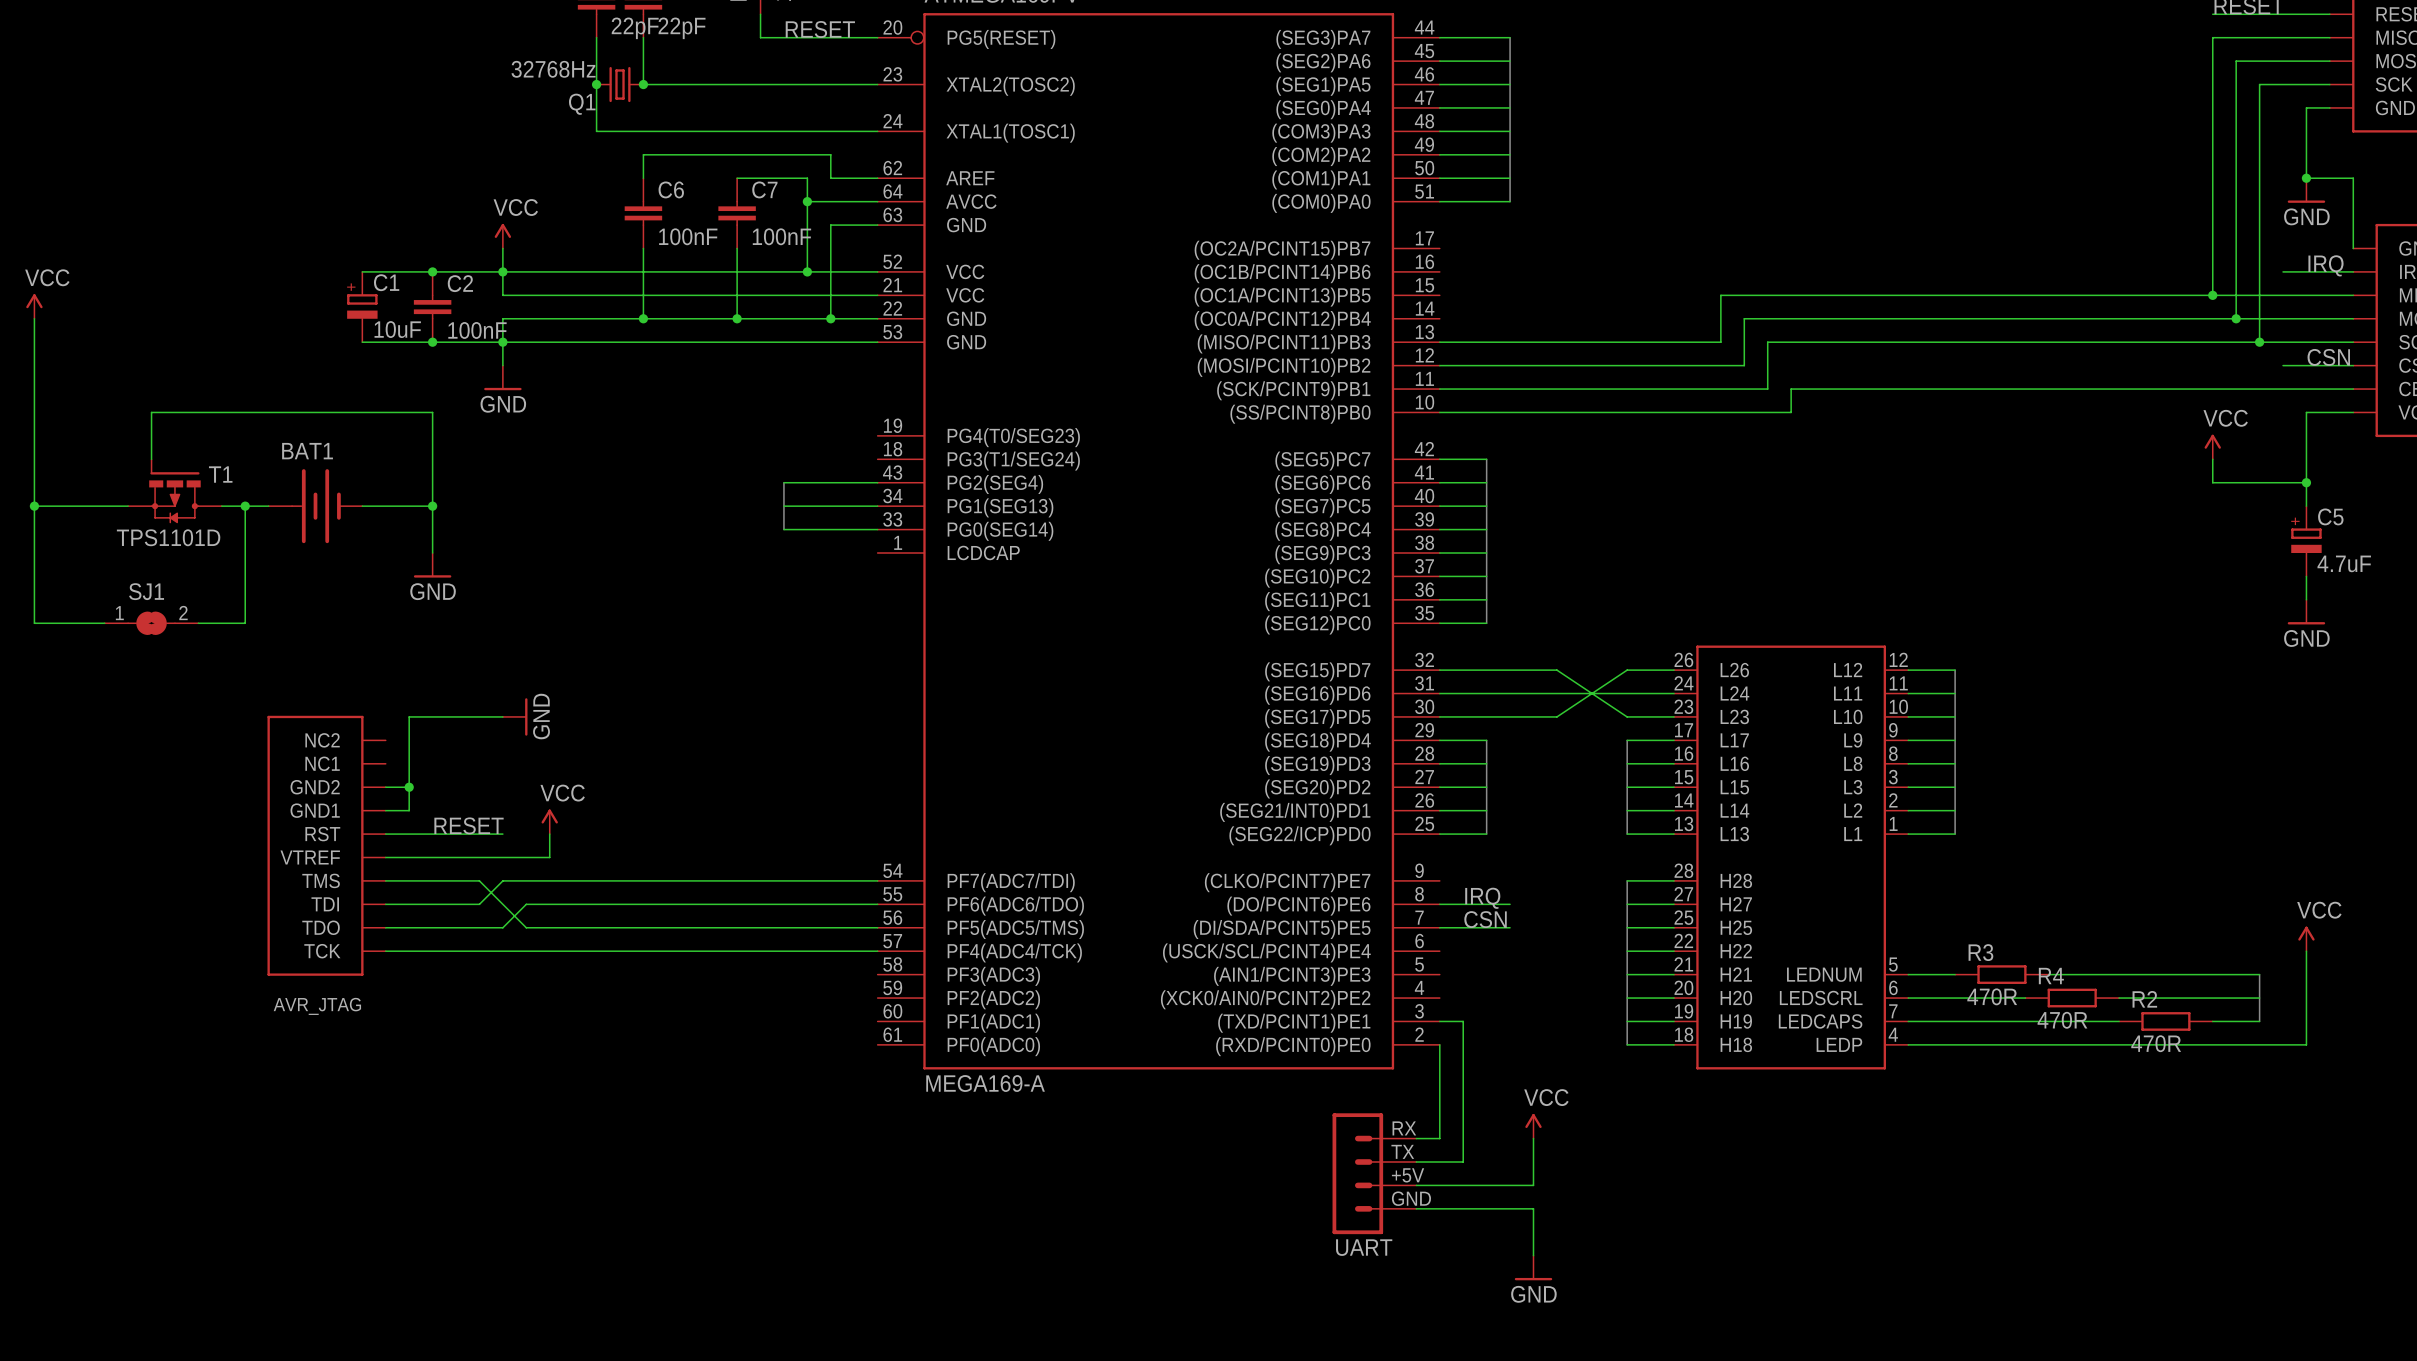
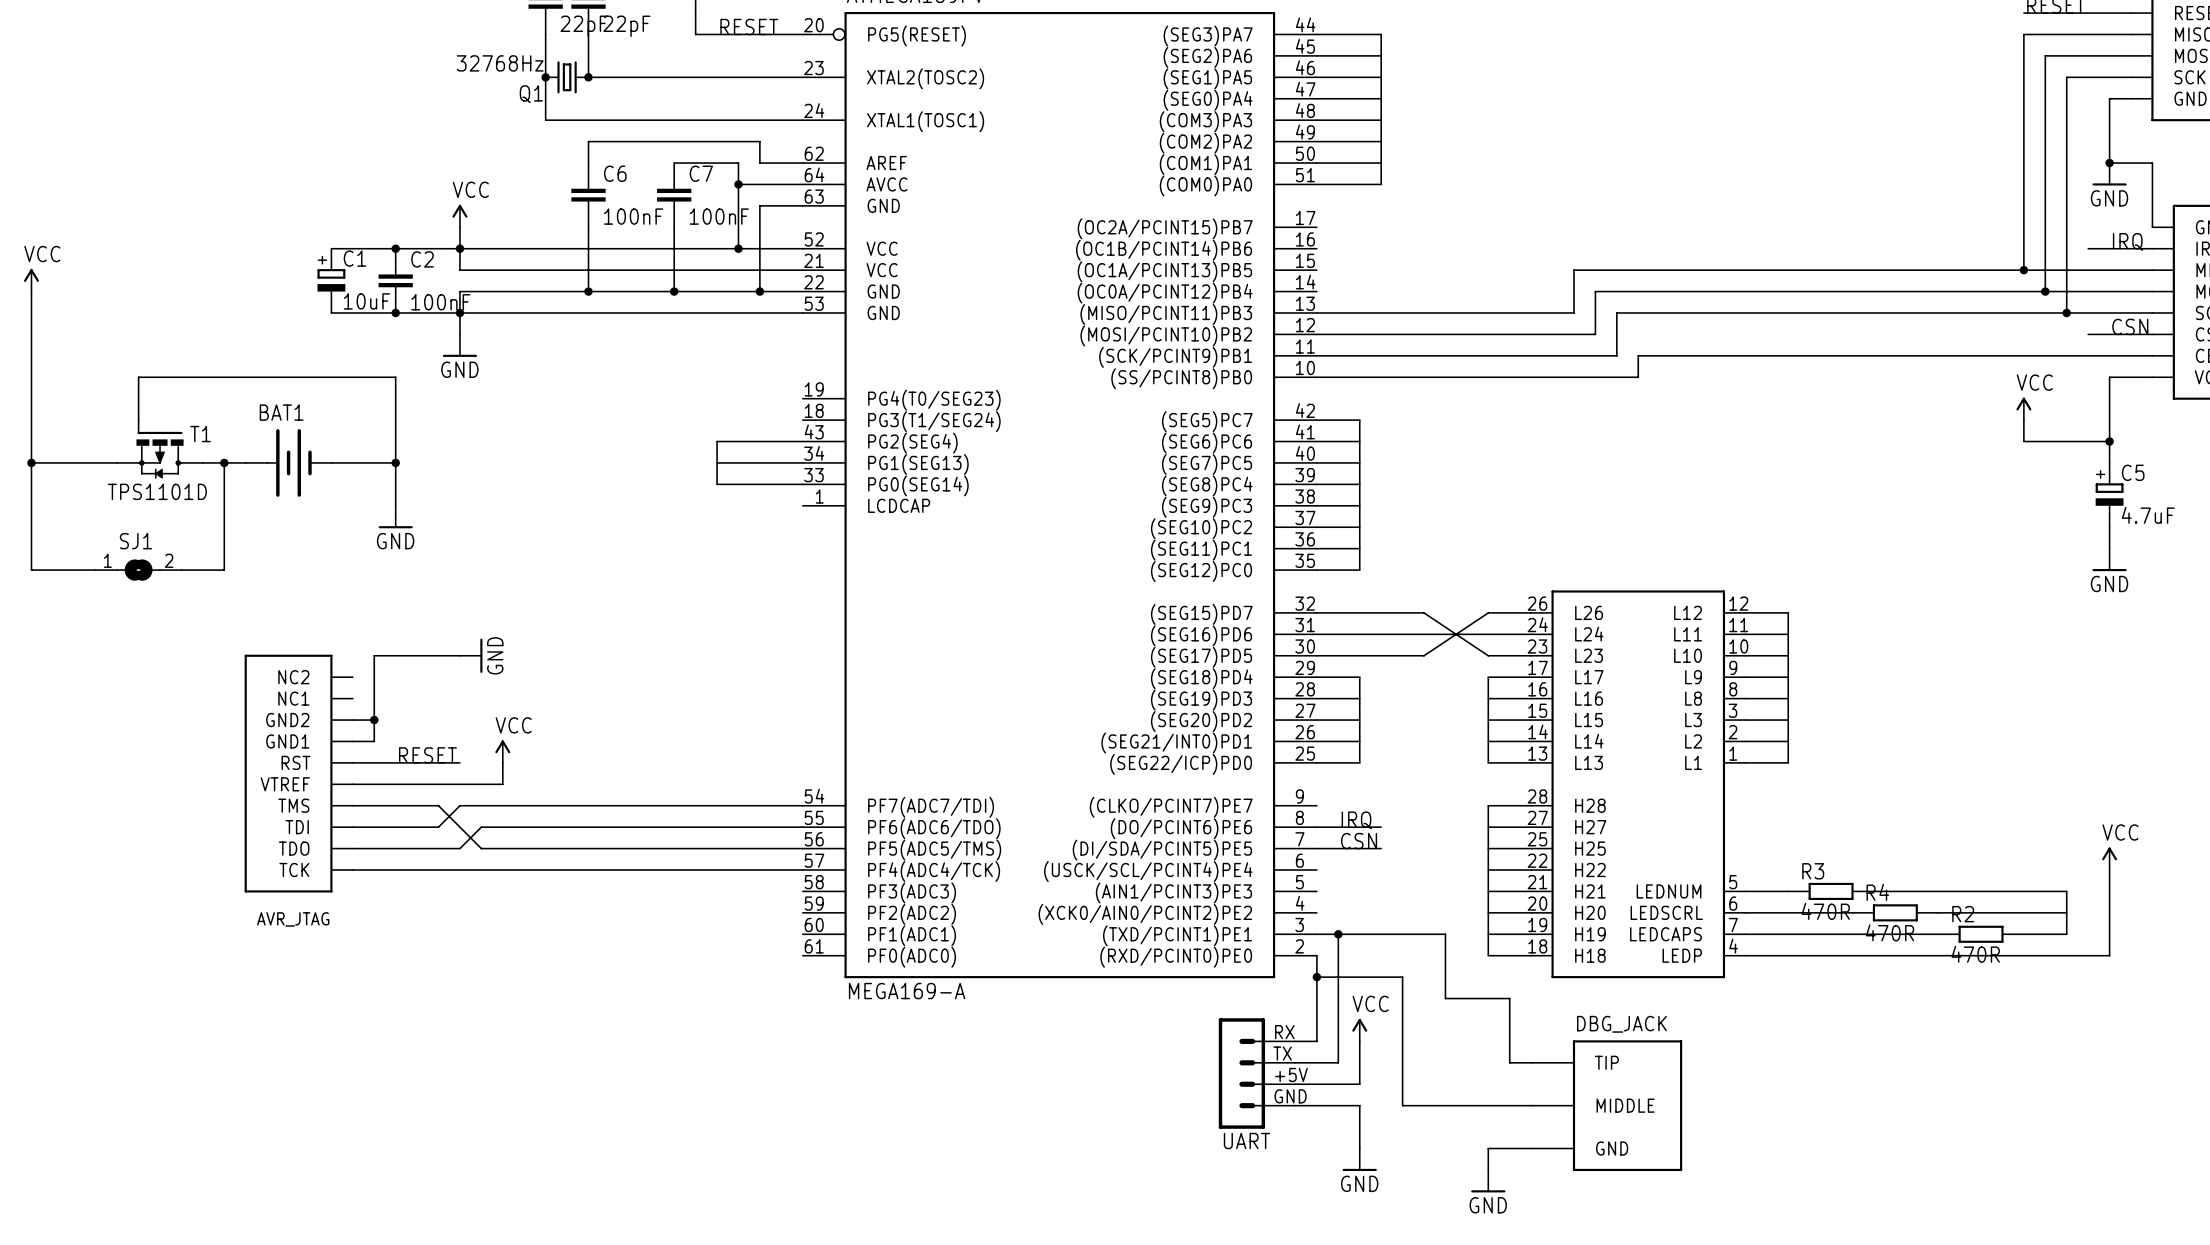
wire: none -> (1338, 934) (1445, 934) (1445, 998) (1509, 998) (1509, 1062) (1531, 1062)
junction: none -> (1338, 934)
wire: none -> (1316, 977) (1402, 977) (1402, 1041)
junction: none -> (1316, 977)
power symbol position: VCC (1533, 1126) -> VCC (1359, 1030)
wire: (1486, 1185) (1533, 1185) -> (1359, 1084) (1359, 1041)
wire: none -> (1402, 1084) (1402, 1105) (1531, 1105)
wire: (1486, 1208) (1533, 1208) (1533, 1255) -> (1359, 1105) (1359, 1148)
DBG_JACK: none -> (1606, 1105)
wire: none -> (1531, 1148) (1488, 1148) (1488, 1169)
power symbol position: GND (1533, 1267) -> GND (1359, 1159)
power symbol: none -> GND (1488, 1181)

